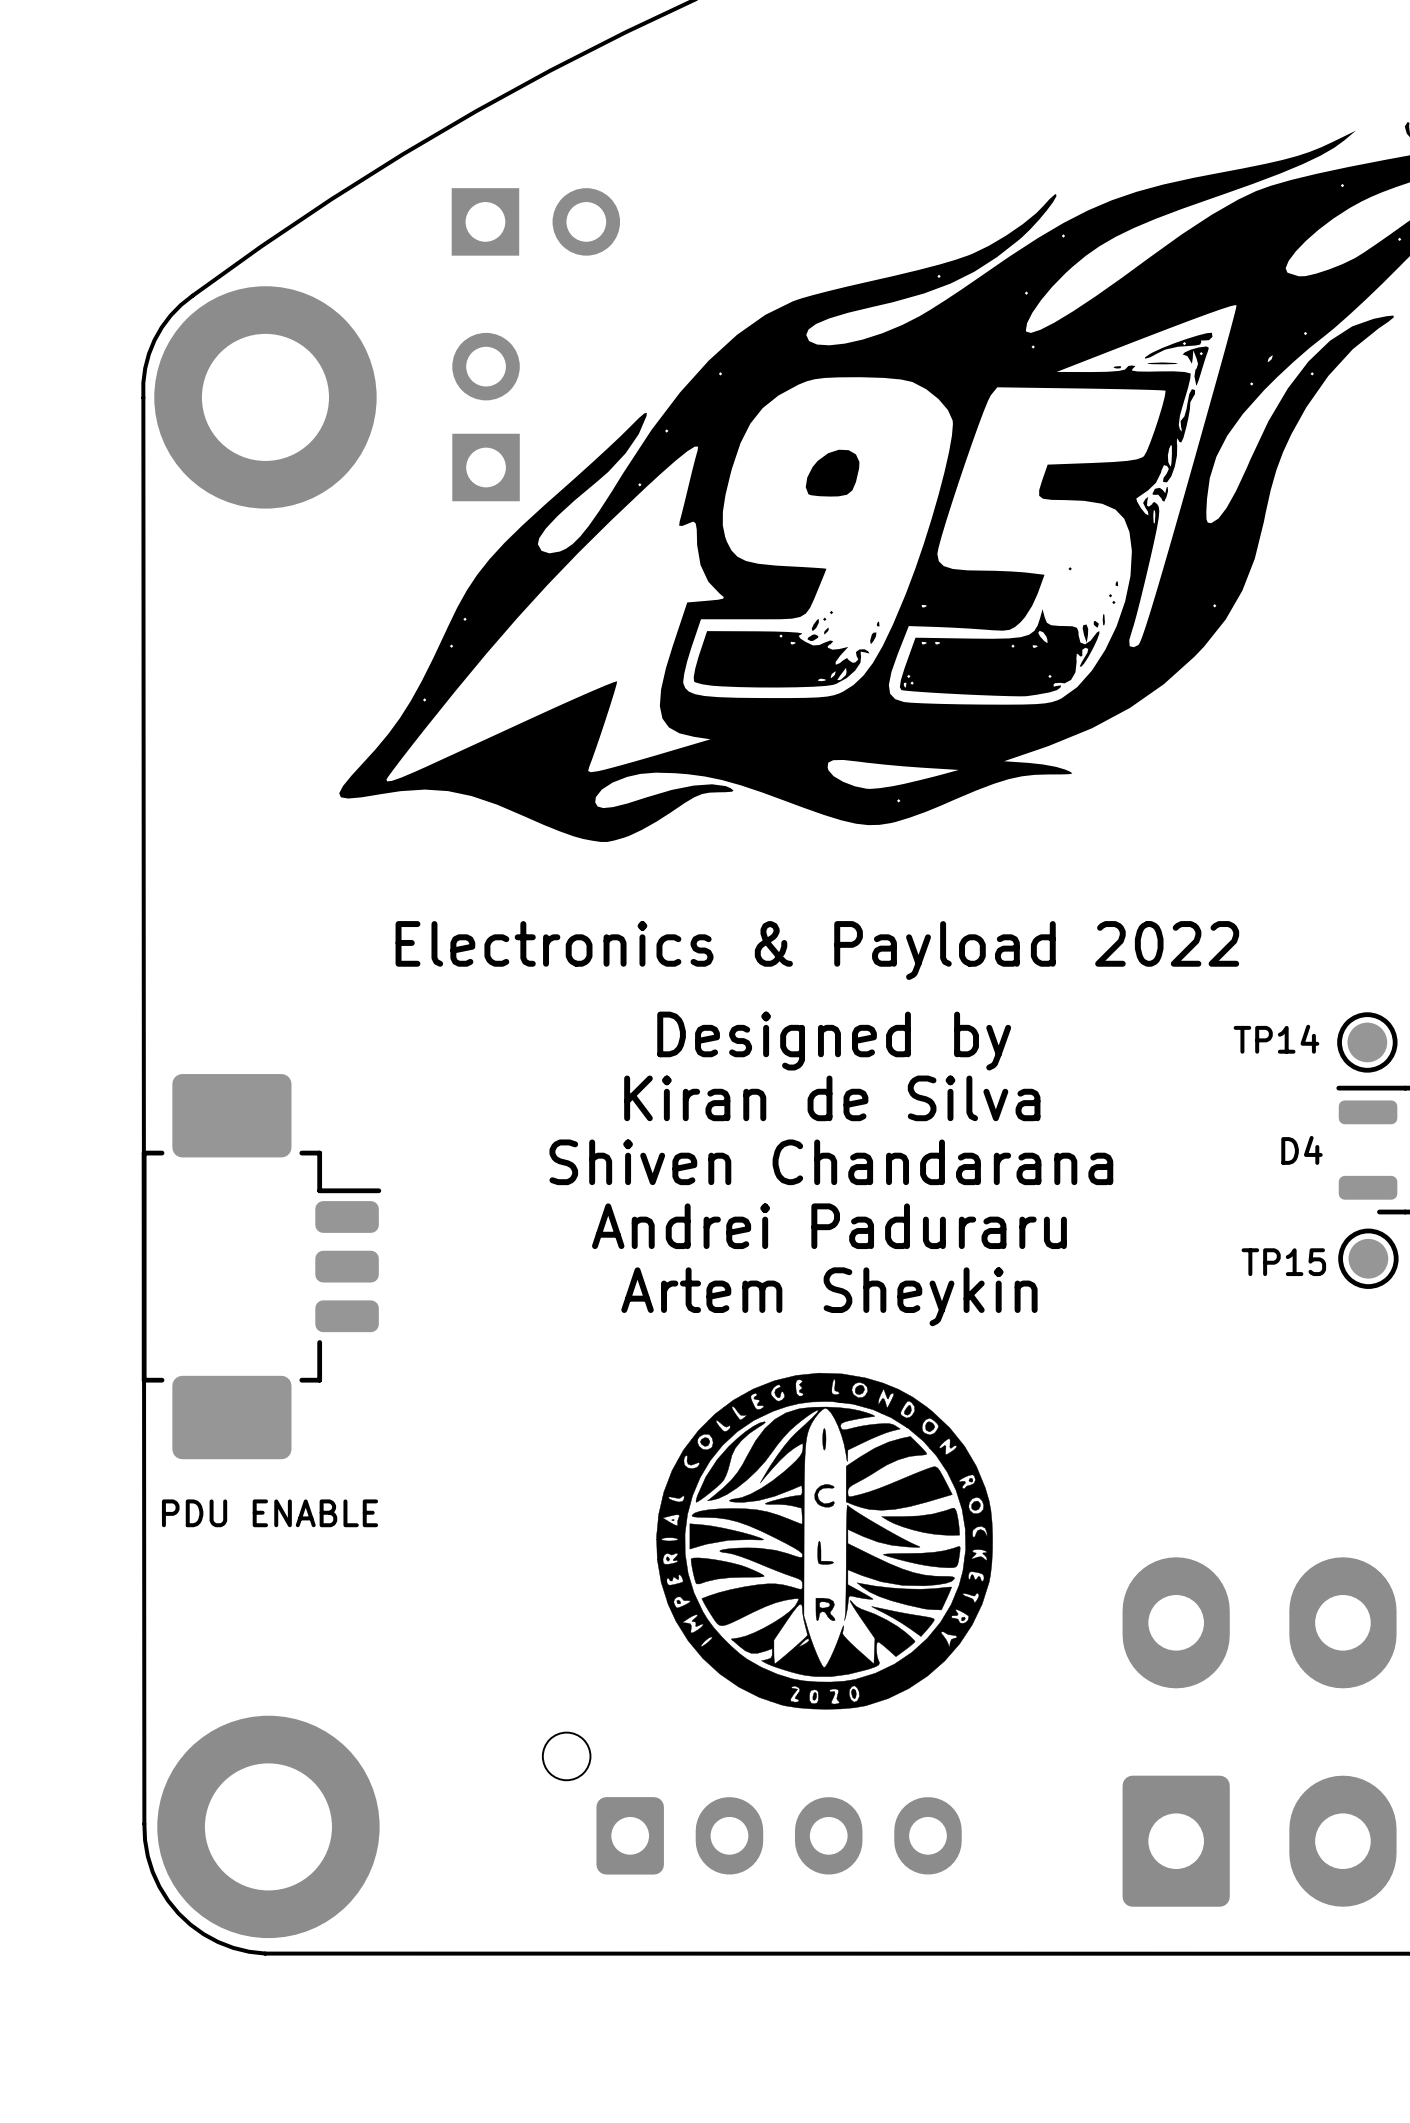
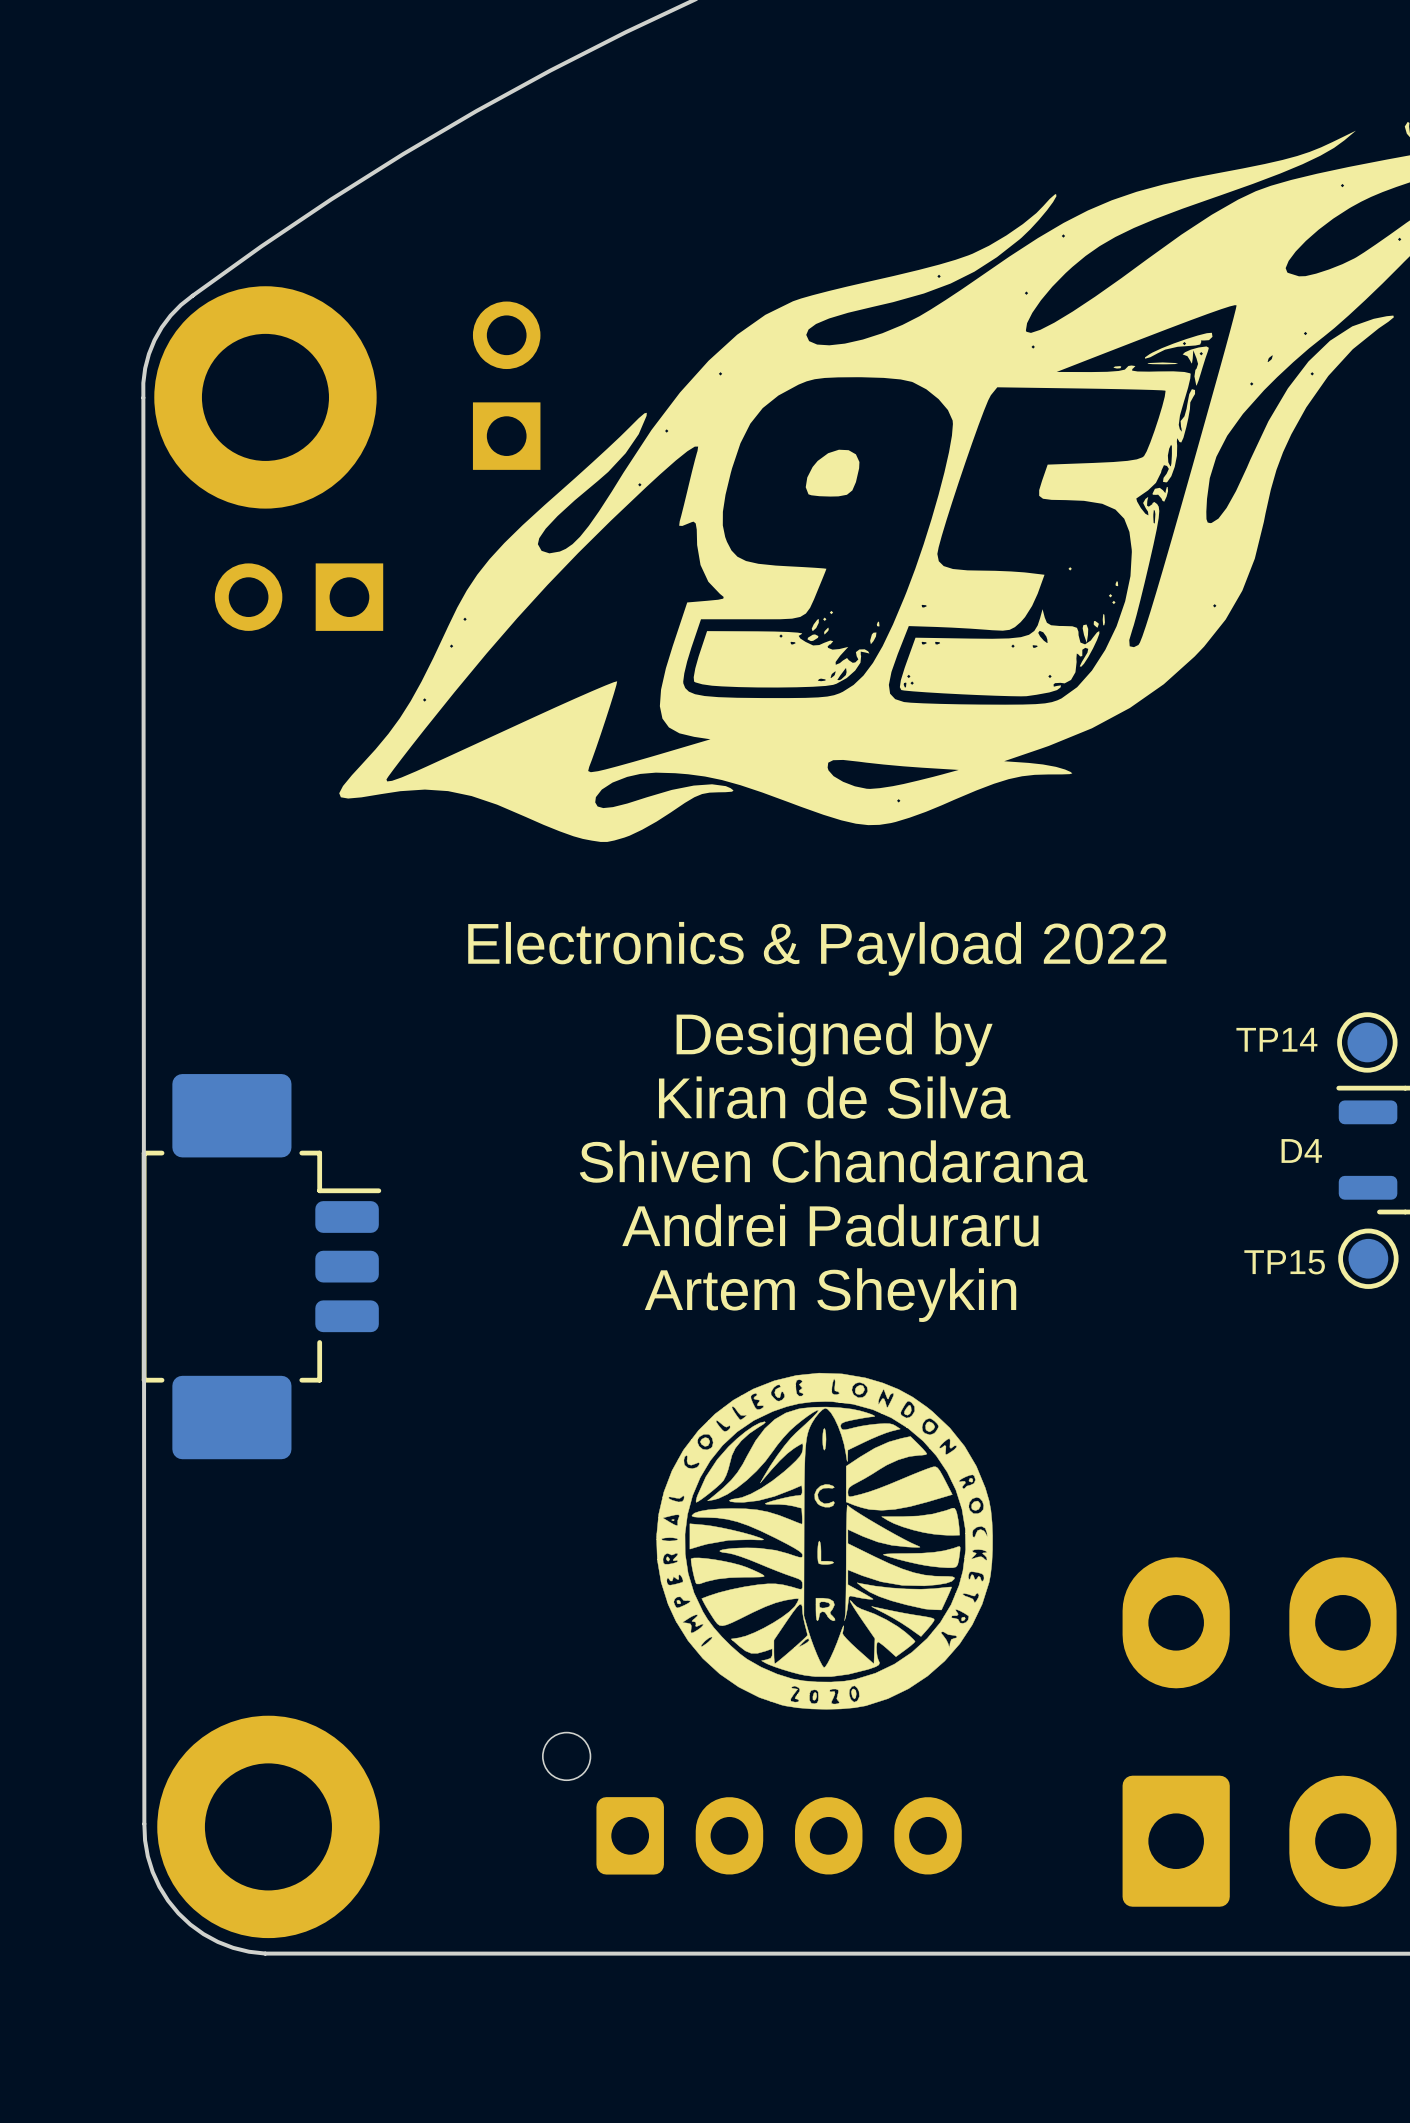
part rotation: 0° (535, 221) -> 180° (299, 597)
part position: (535, 221) -> (299, 597)
part position: (486, 417) -> (506, 385)
text: PDU ENABLE (270, 1513) -> none

